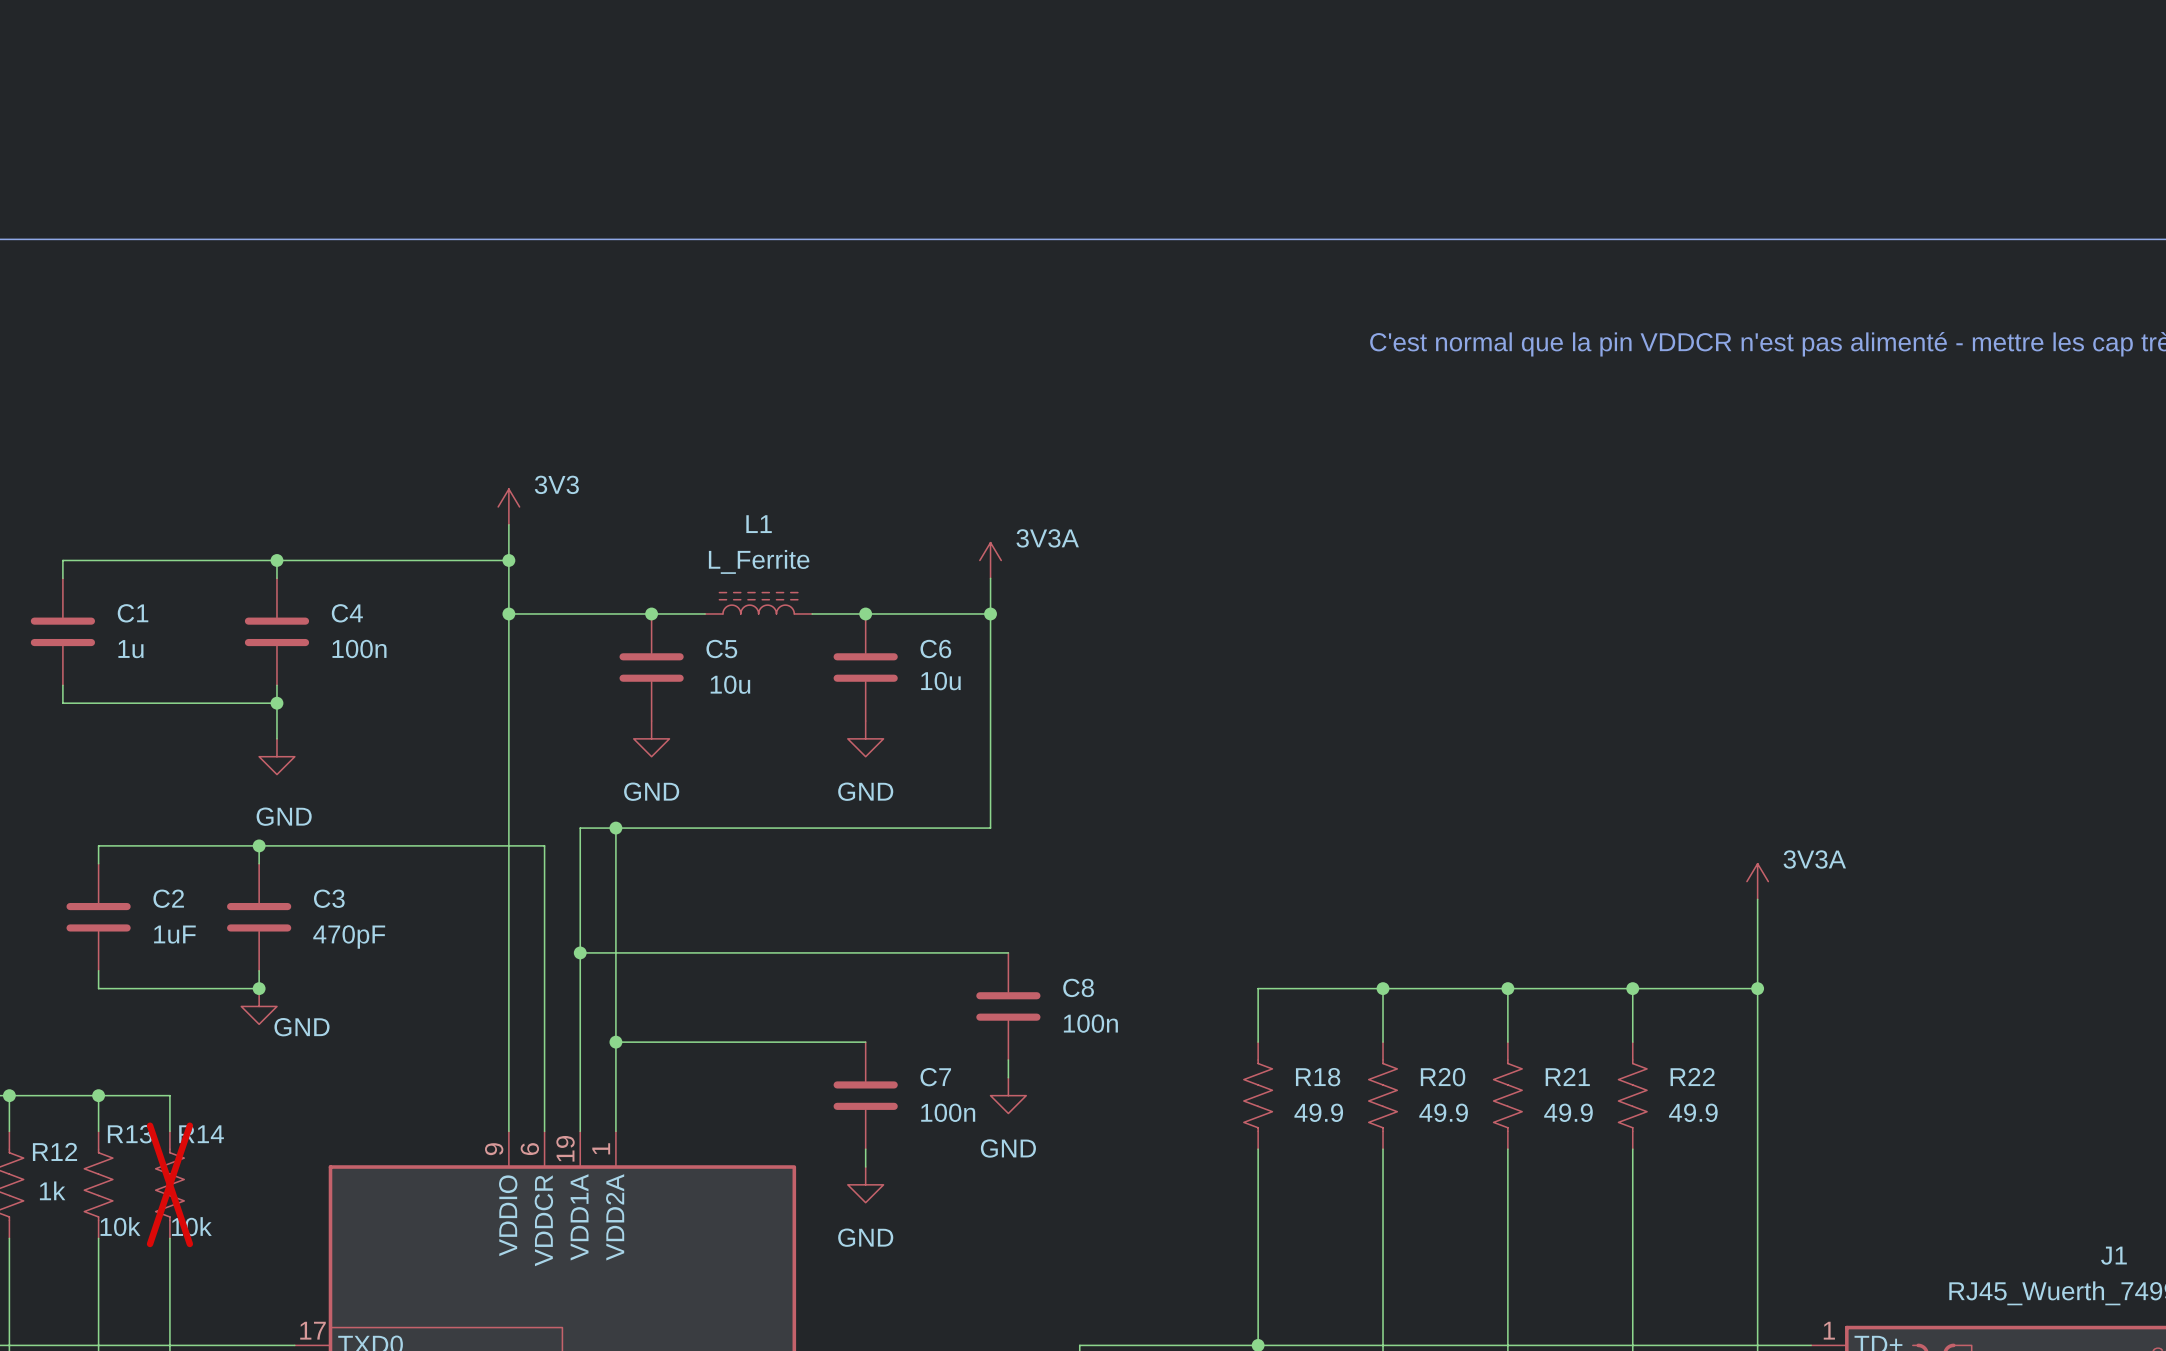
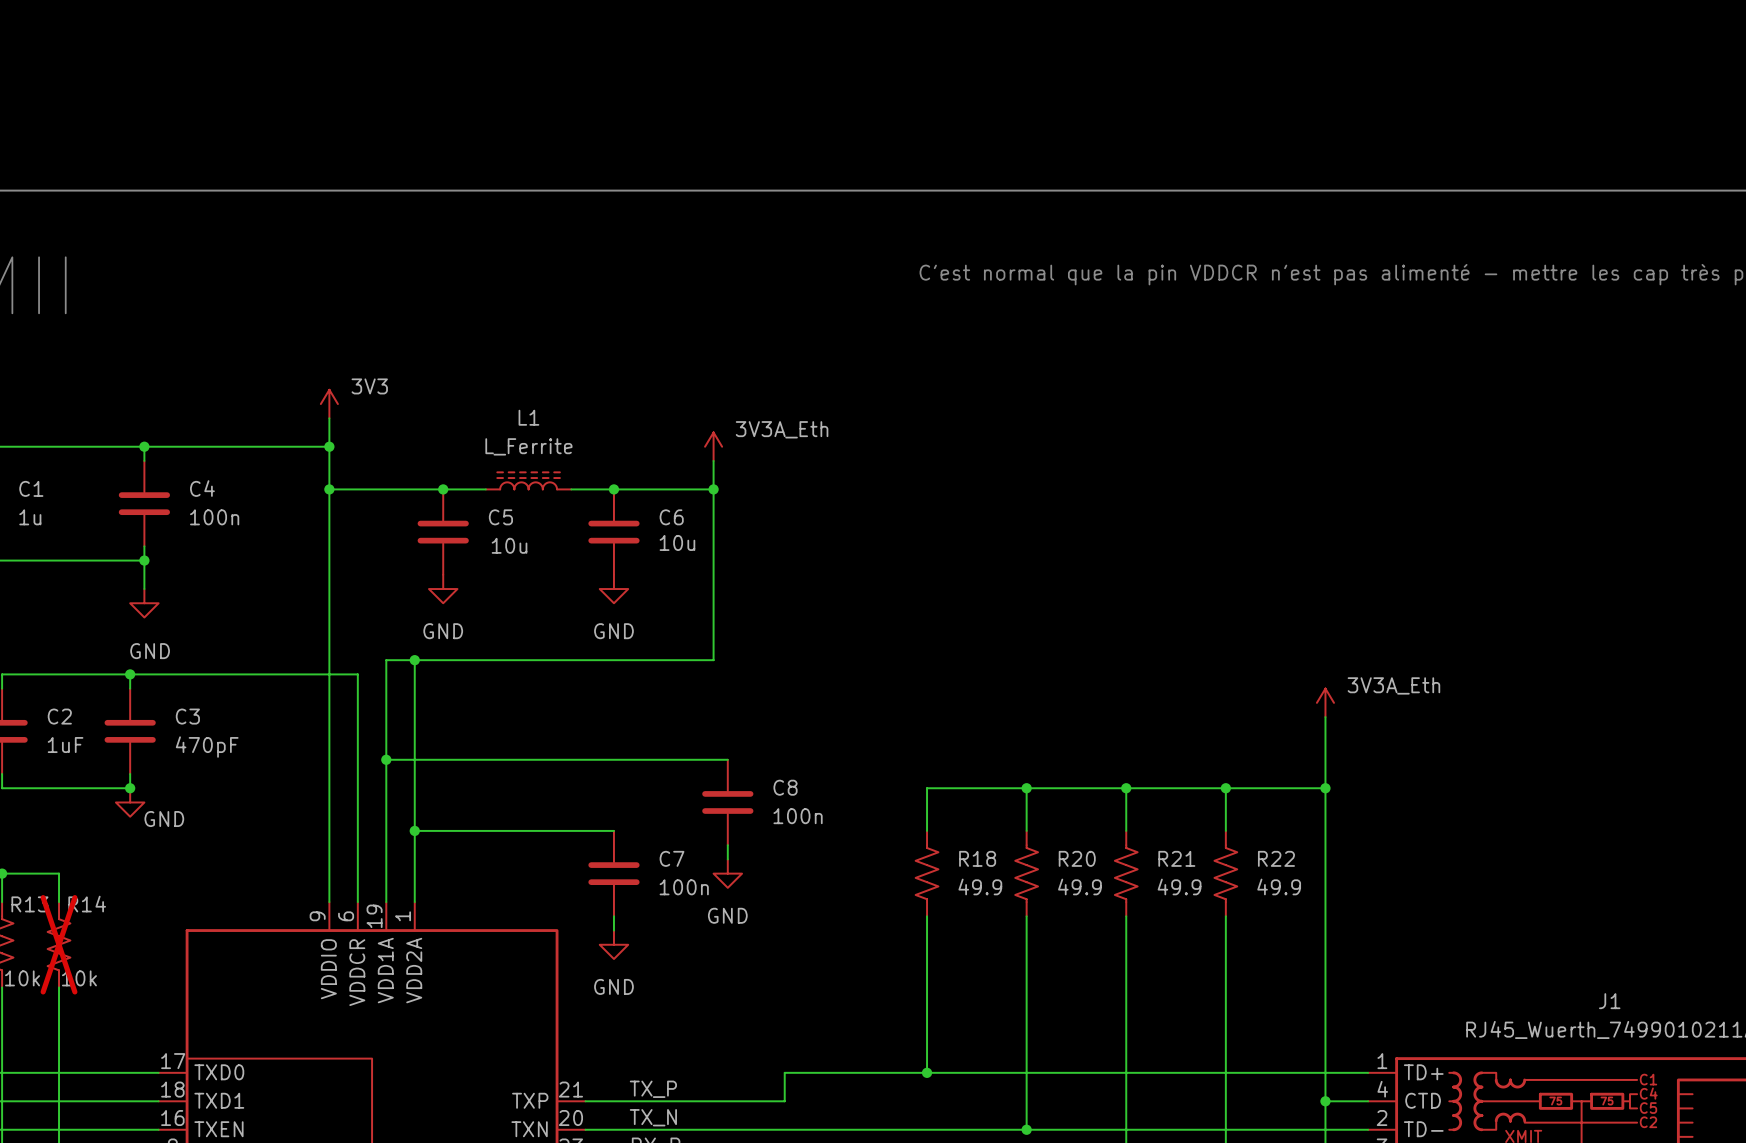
power symbol: 3V3A (990, 560) -> 3V3A_Eth (713, 446)
power symbol: 3V3A (1757, 881) -> 3V3A_Eth (1325, 702)

